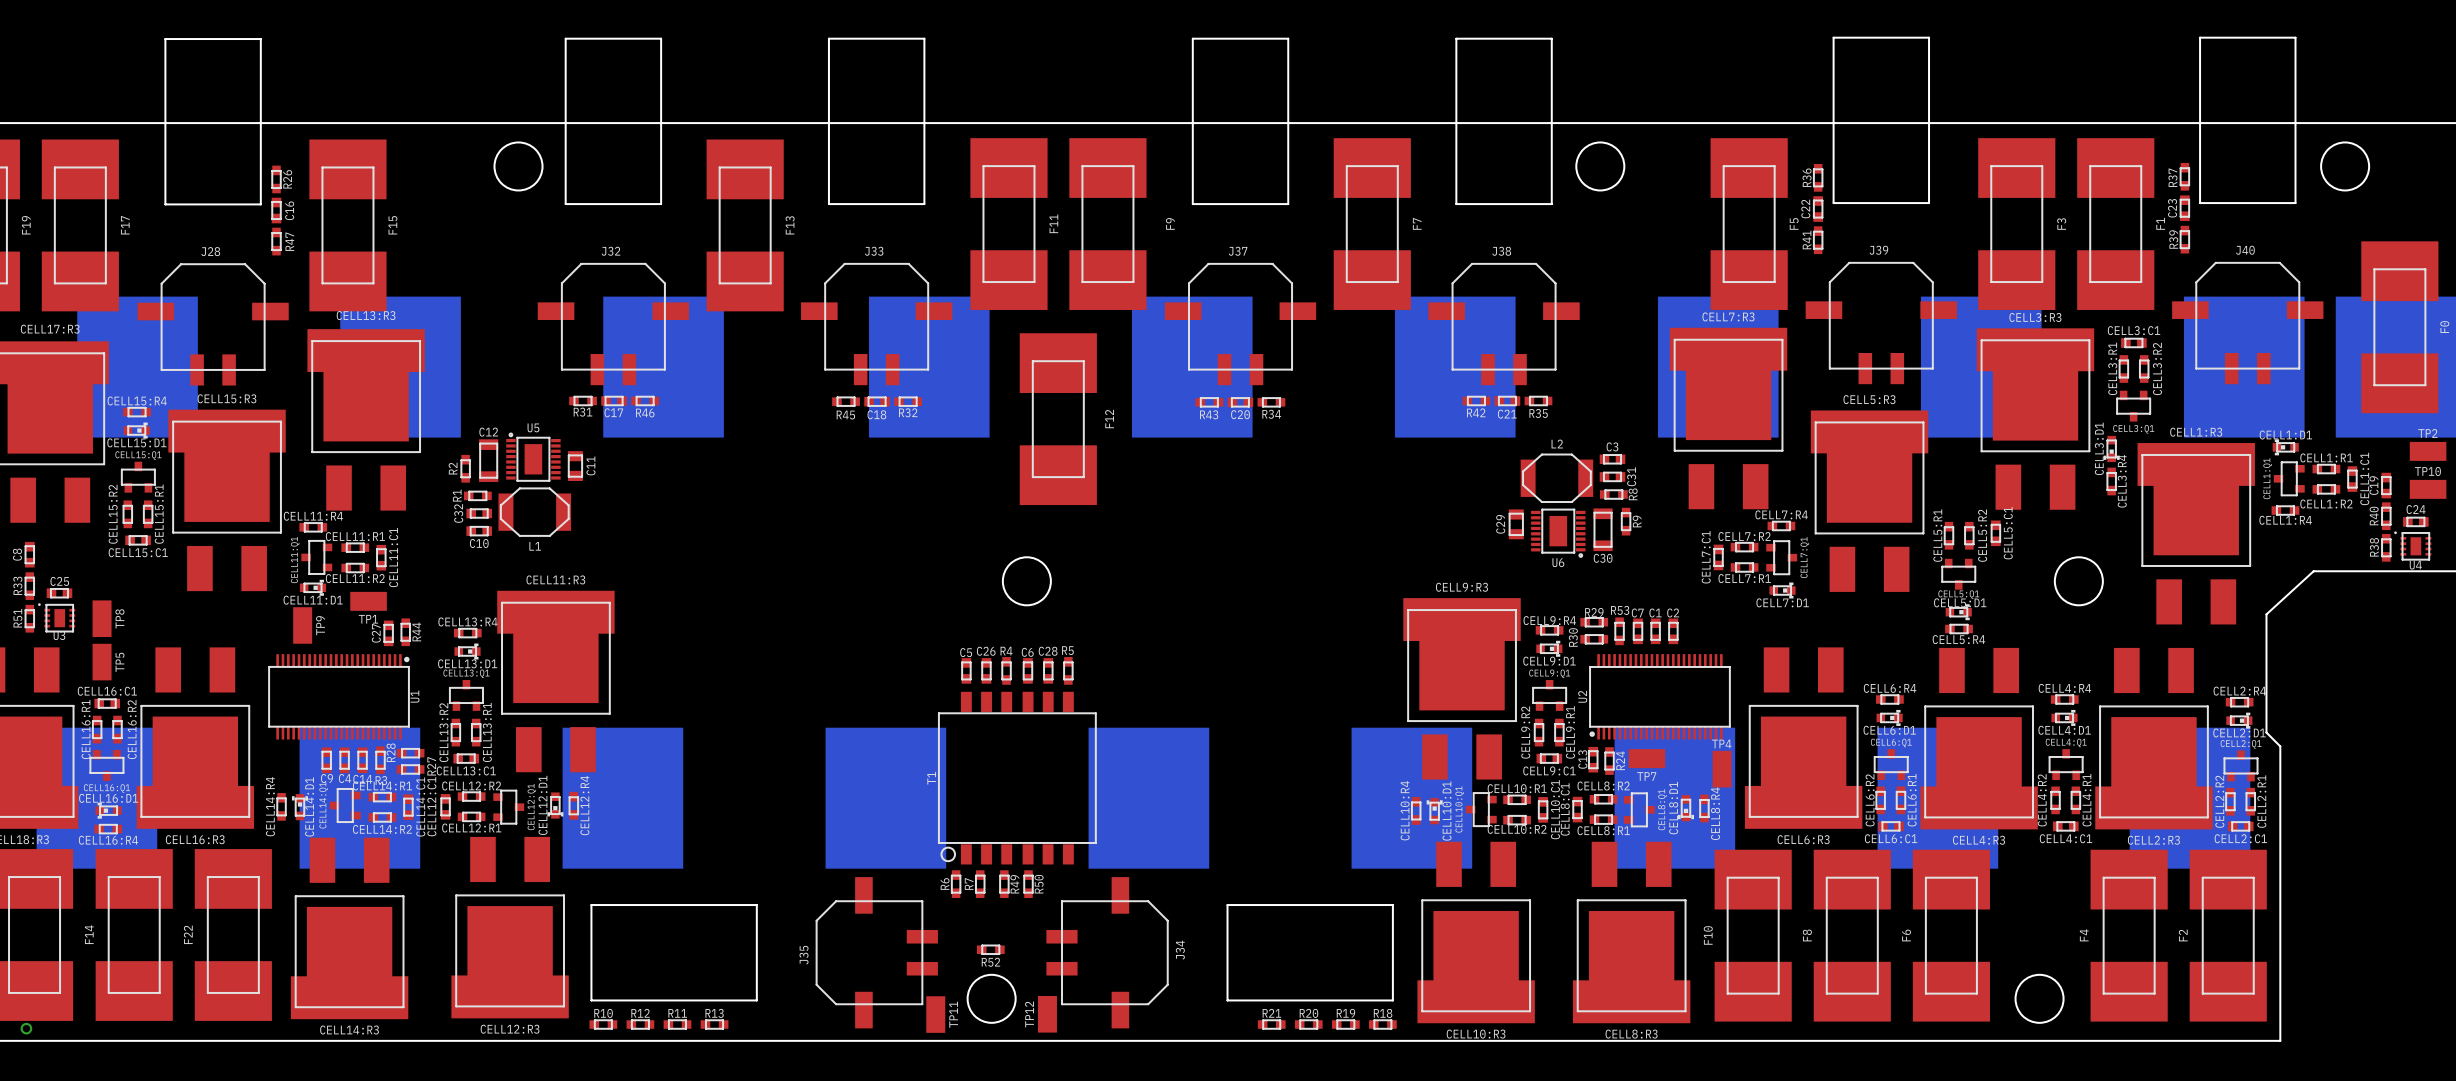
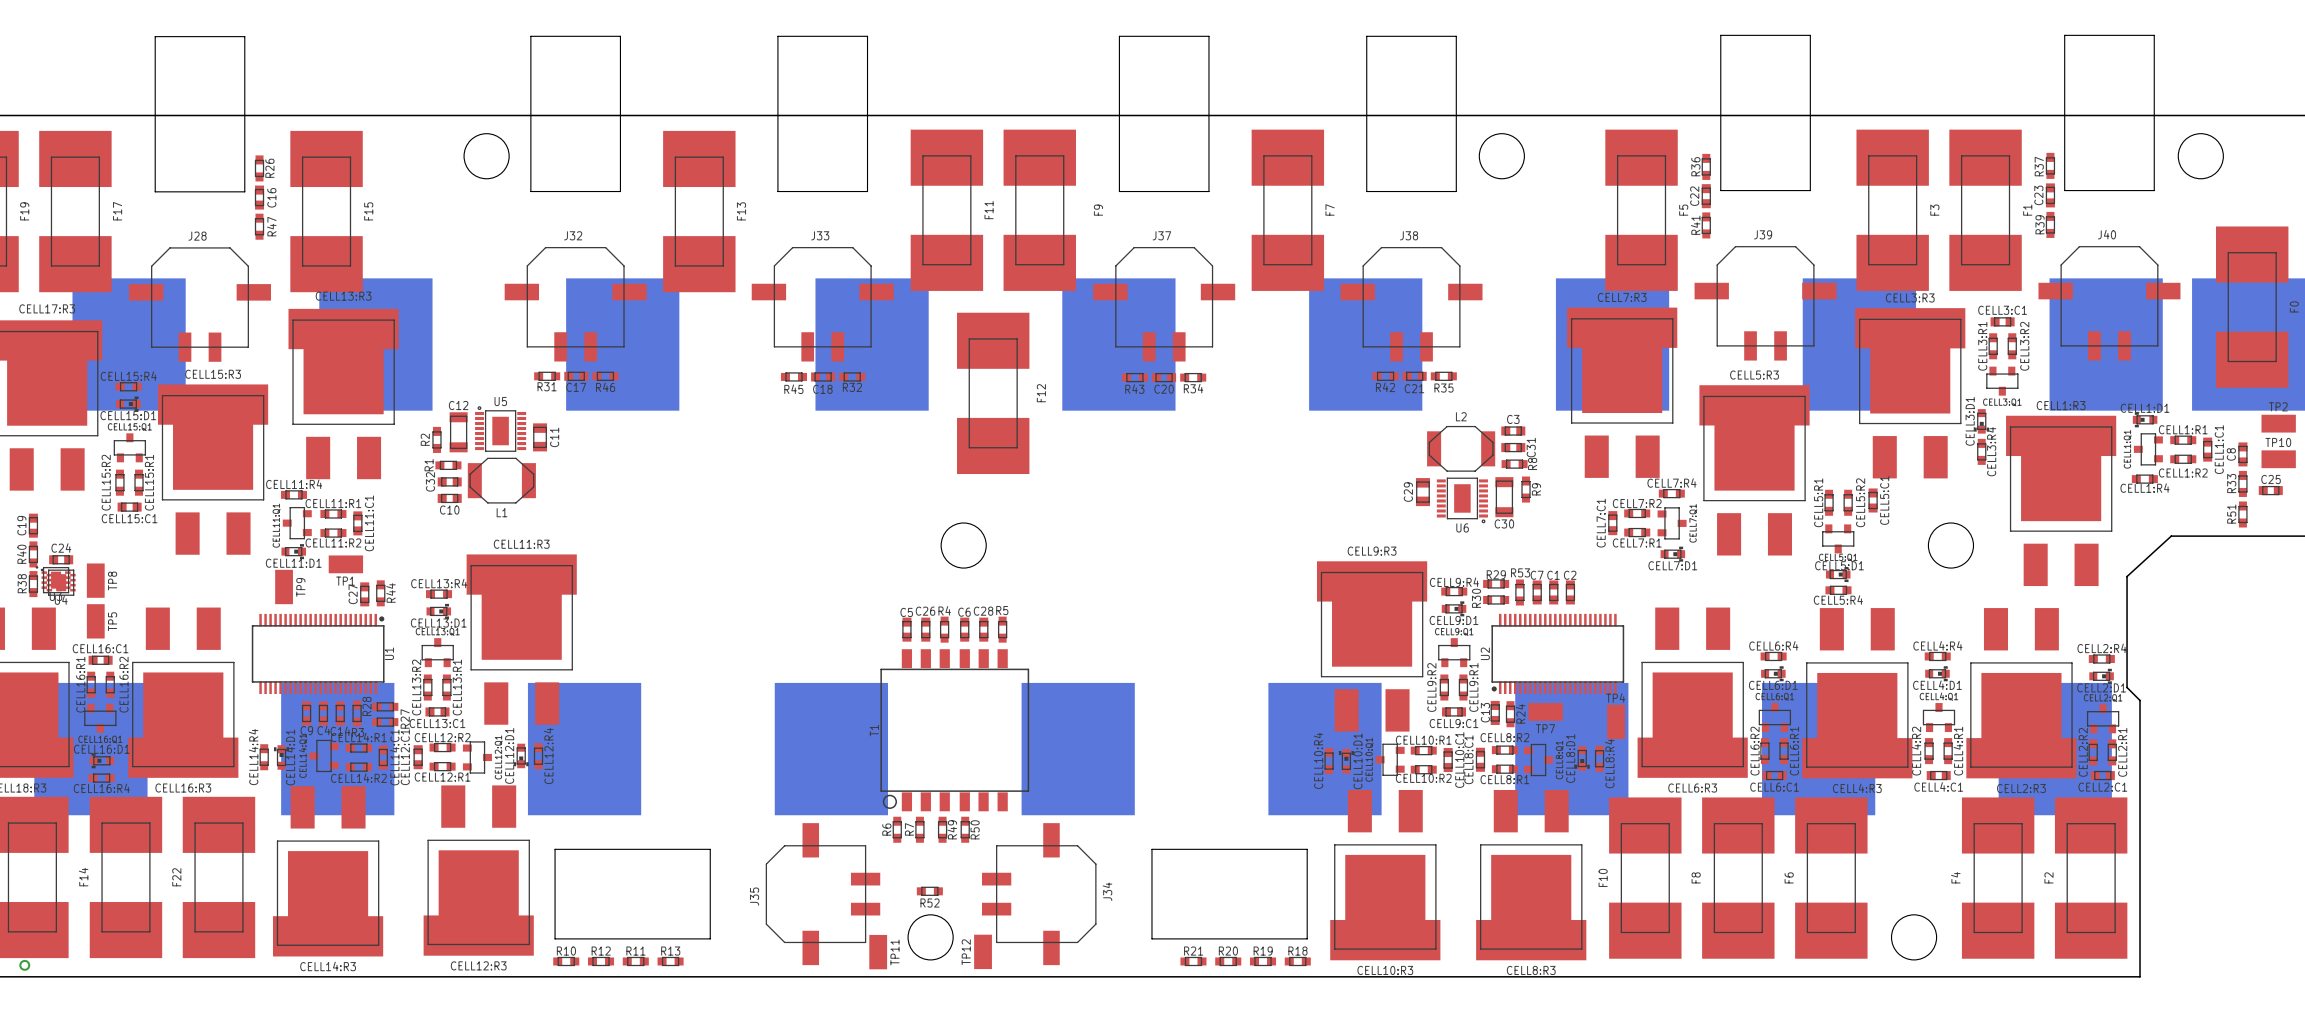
C19 position: (2386, 485) -> (33, 525)
R40 position: (2386, 516) -> (33, 554)
C24 position: (2415, 521) -> (61, 559)
U4 position: (2412, 545) -> (58, 582)
R38 position: (2386, 547) -> (33, 584)
C8 position: (29, 554) -> (2242, 454)
R33 position: (29, 586) -> (2242, 483)
C25 position: (59, 593) -> (2270, 490)
R51 position: (29, 618) -> (2242, 514)

